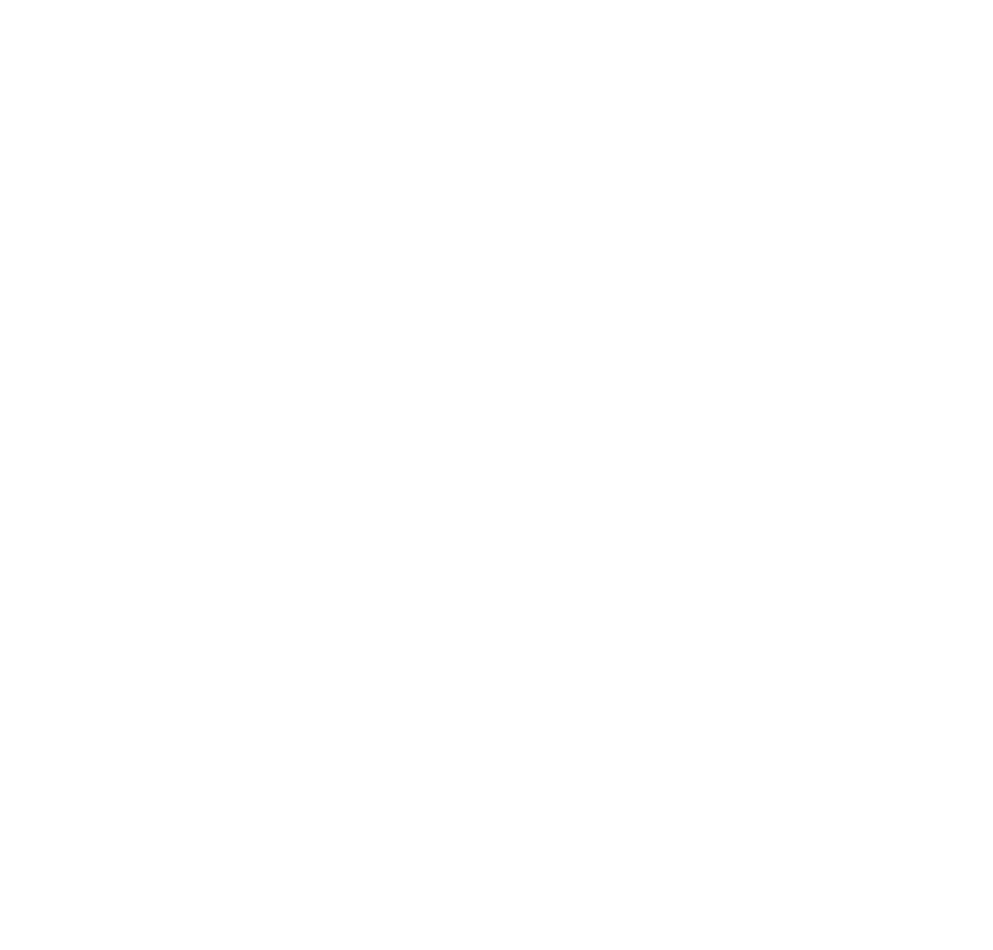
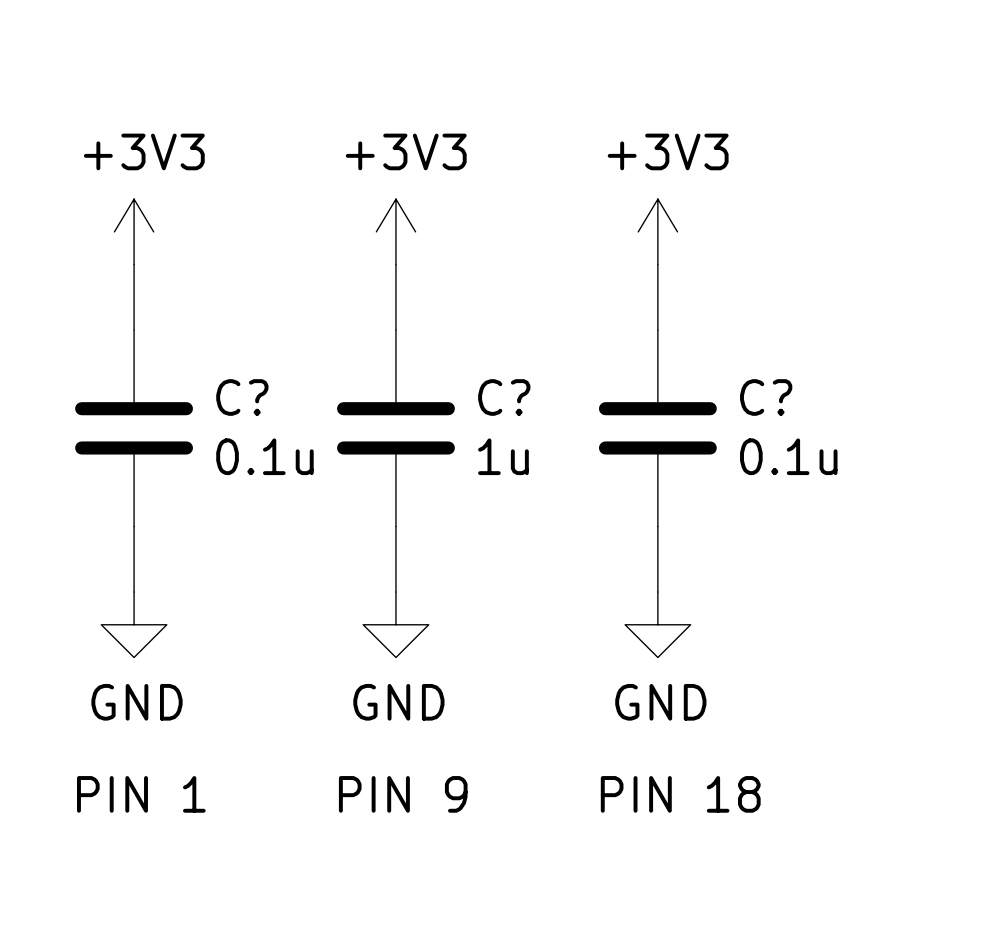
power symbol: none -> +3V3 (134, 231)
power symbol: none -> +3V3 (395, 231)
power symbol: none -> +3V3 (657, 231)
wire: none -> (134, 264) (134, 330)
wire: none -> (395, 264) (395, 330)
wire: none -> (657, 264) (657, 330)
C?: none -> 0.1u (134, 428)
C?: none -> 1u (395, 428)
C?: none -> 0.1u (657, 428)
wire: none -> (134, 526) (134, 592)
wire: none -> (395, 526) (395, 592)
wire: none -> (657, 526) (657, 592)
power symbol: none -> GND (134, 624)
power symbol: none -> GND (395, 624)
power symbol: none -> GND (657, 624)
text: none -> PIN 1 (141, 794)
text: none -> PIN 9 (403, 794)
text: none -> PIN 18 (680, 794)

